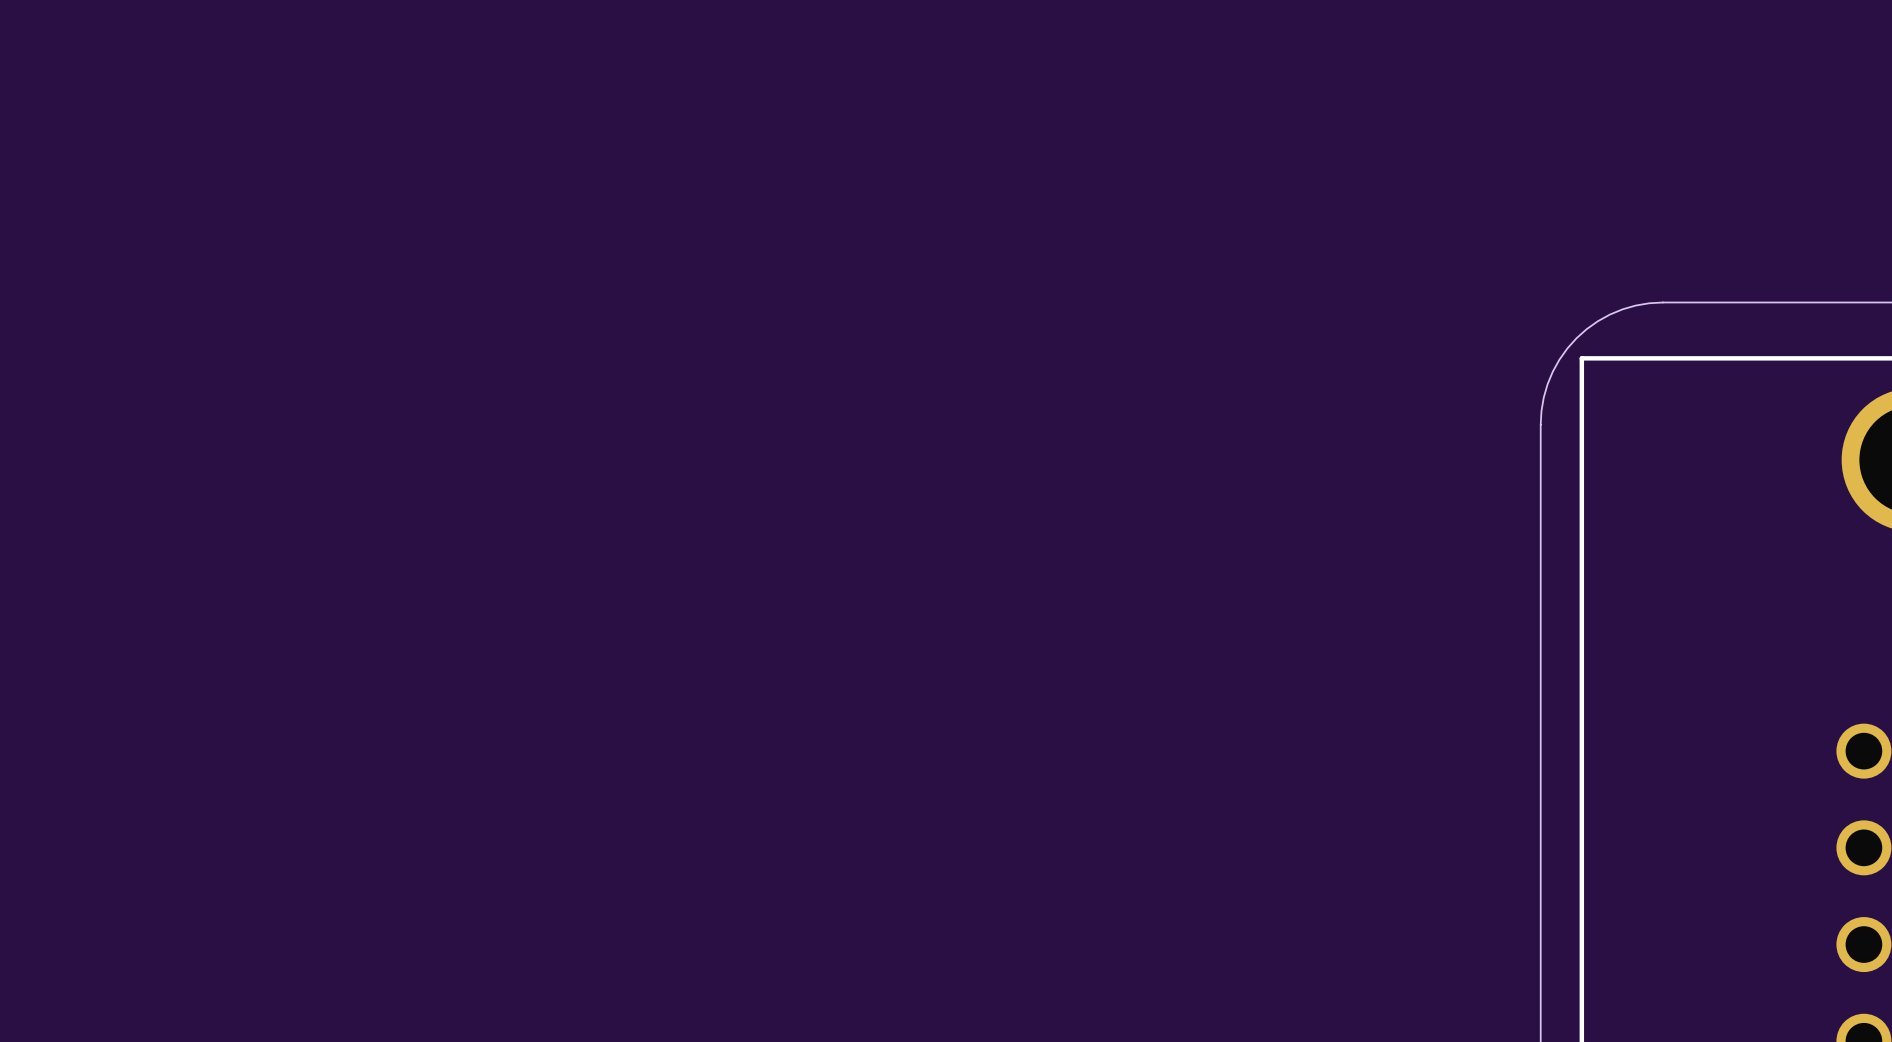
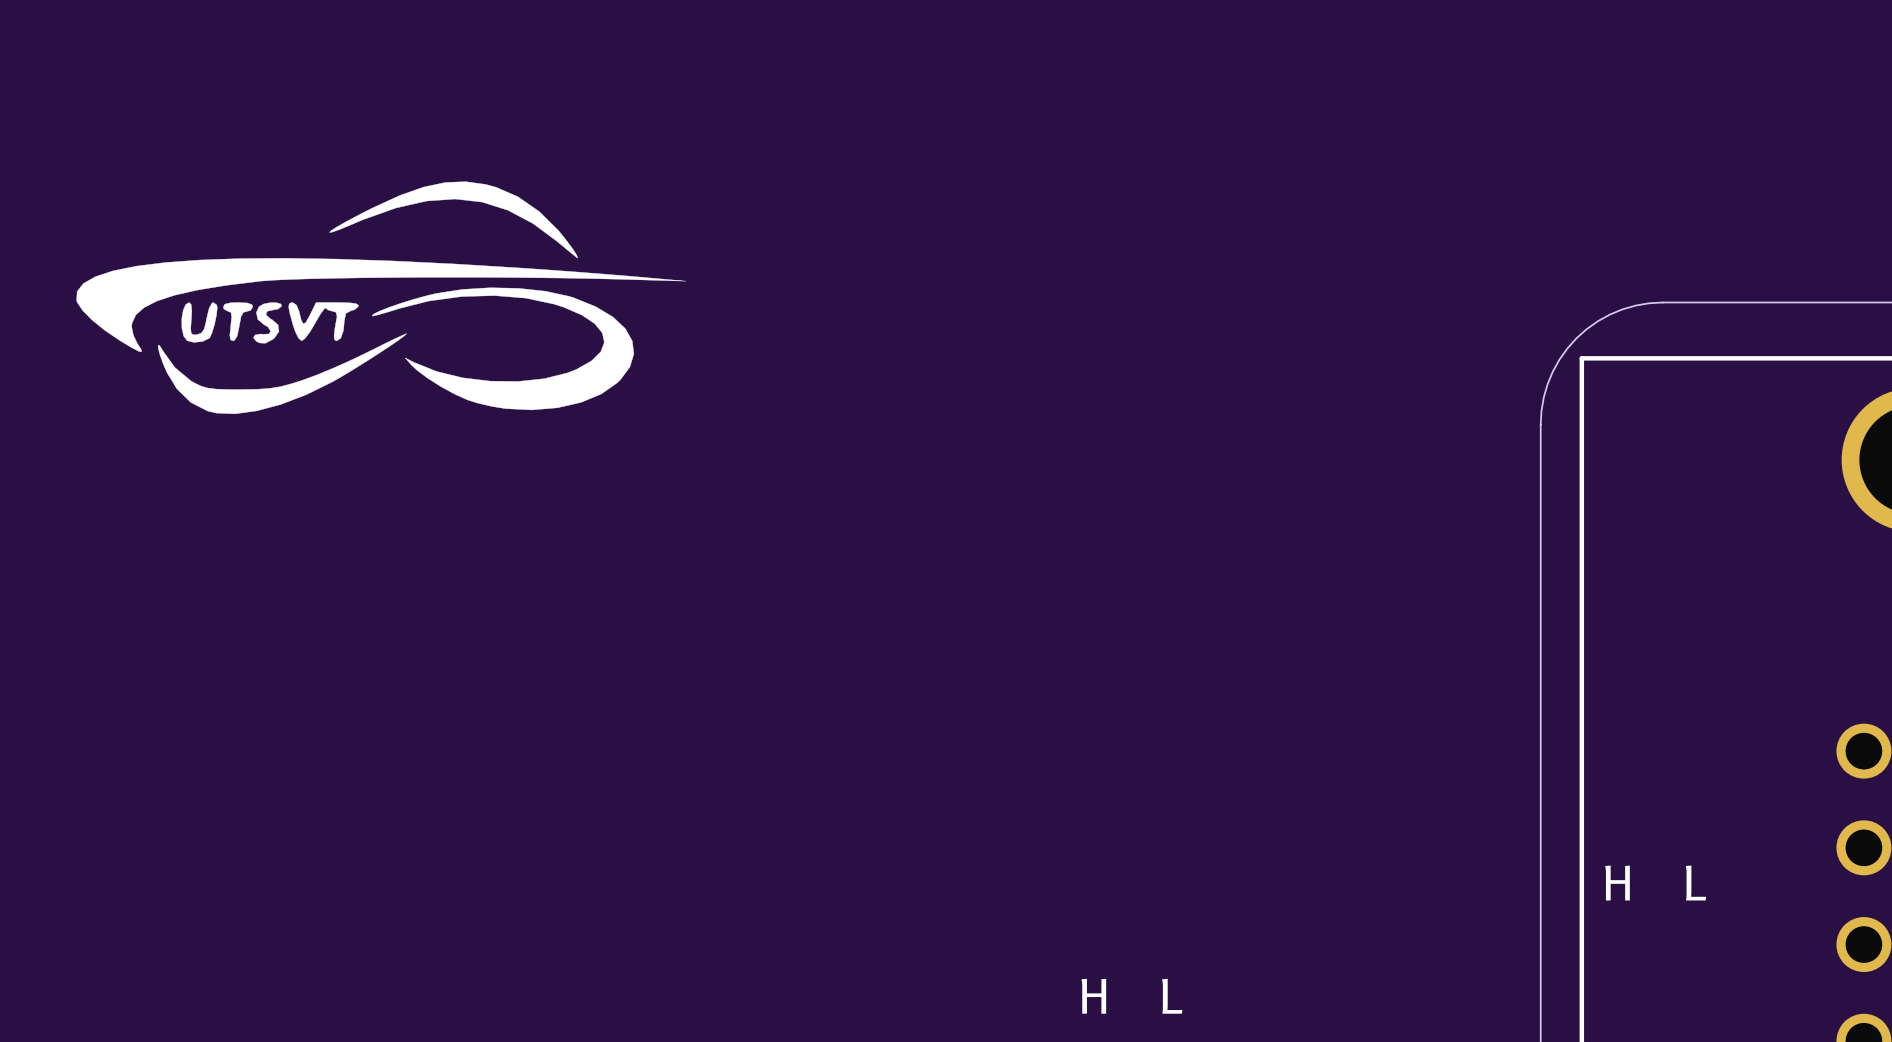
drawing: none -> [76, 181, 687, 415]
text: none -> H L (1655, 883)
text: none -> H L (1131, 996)

